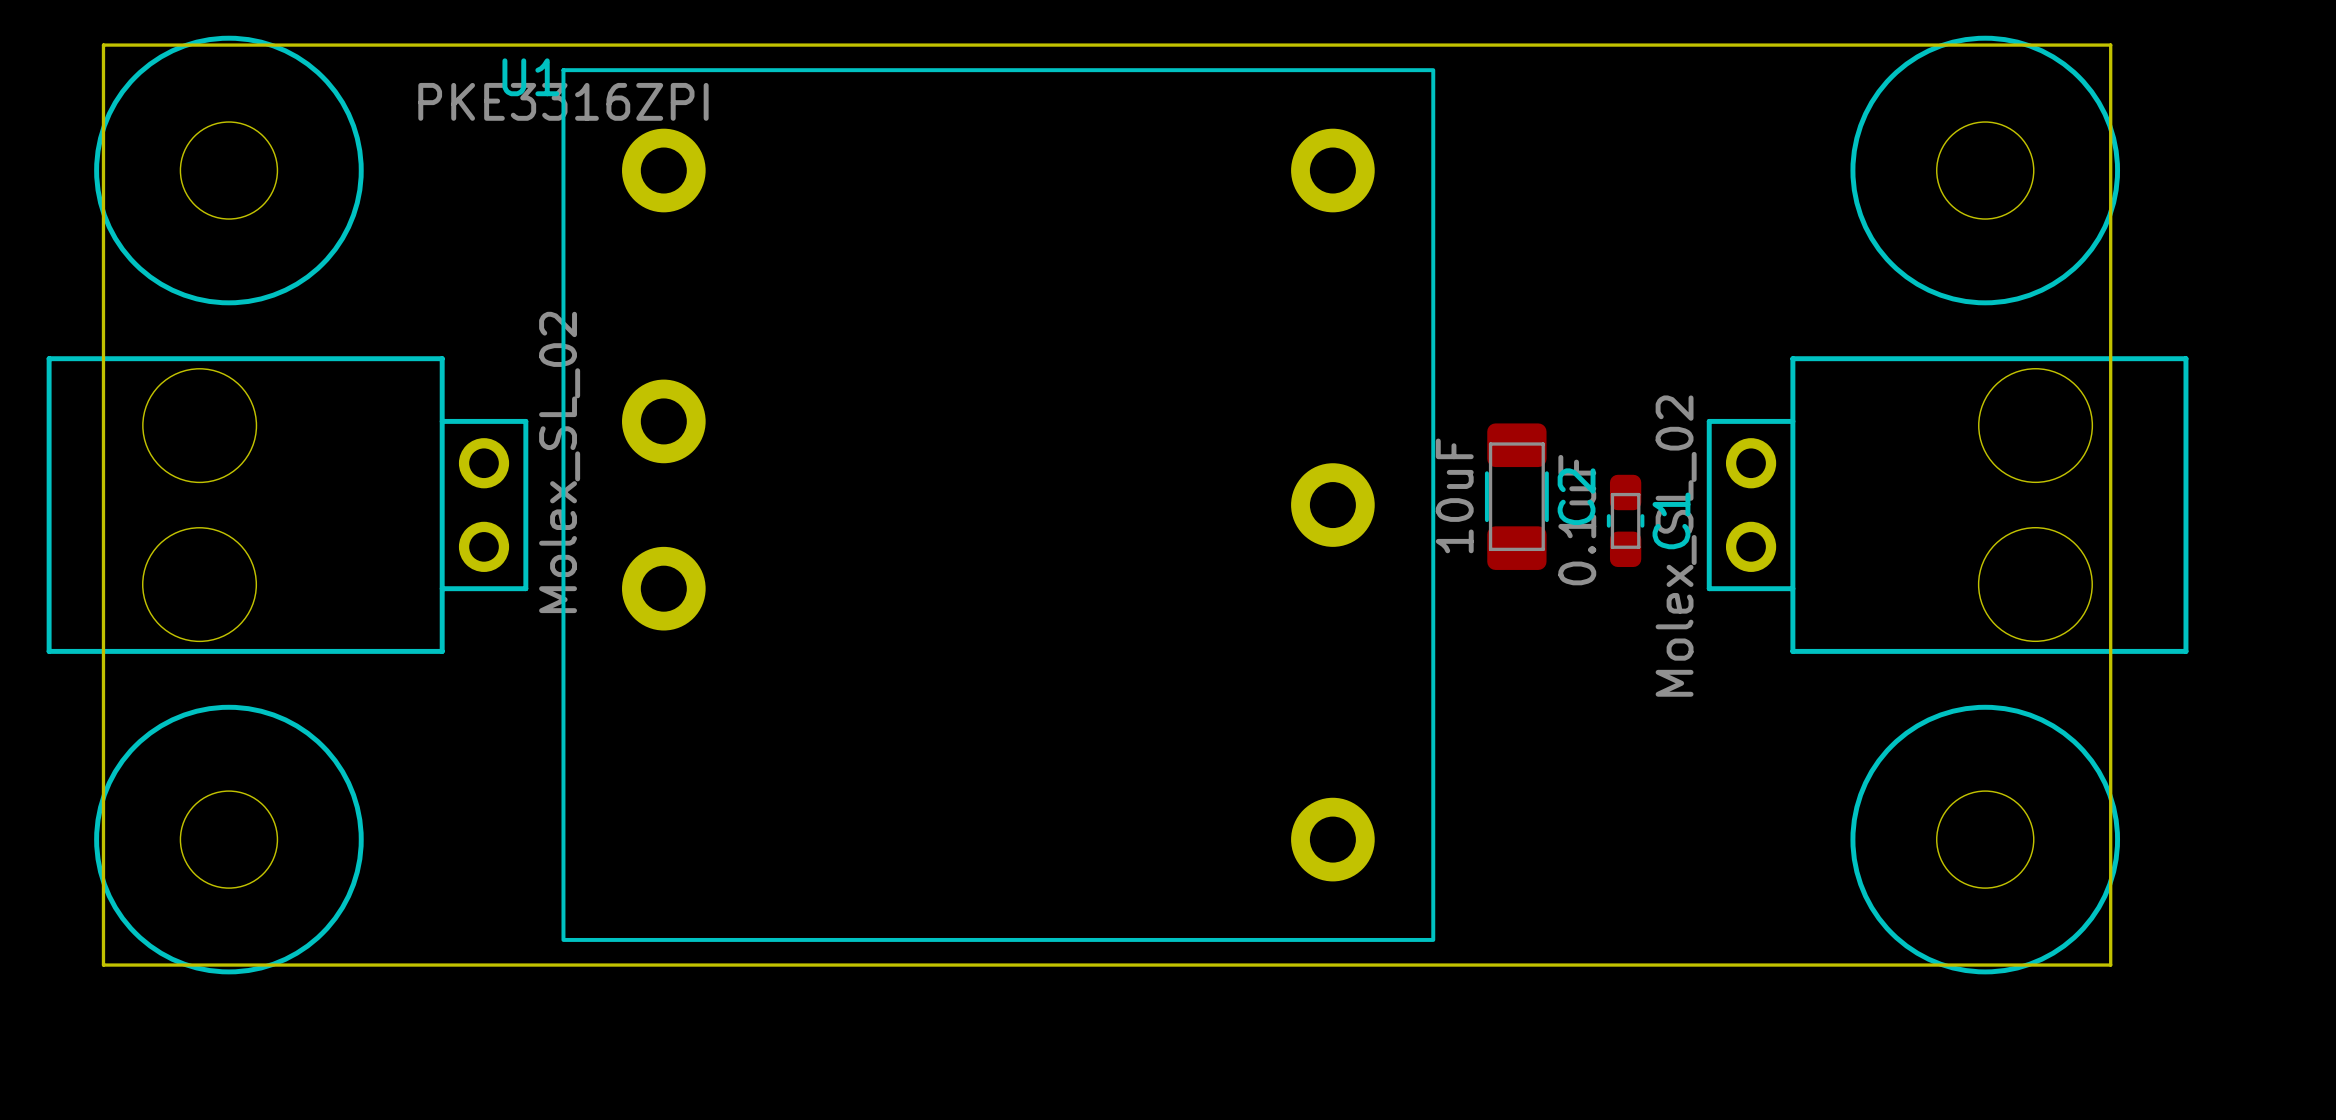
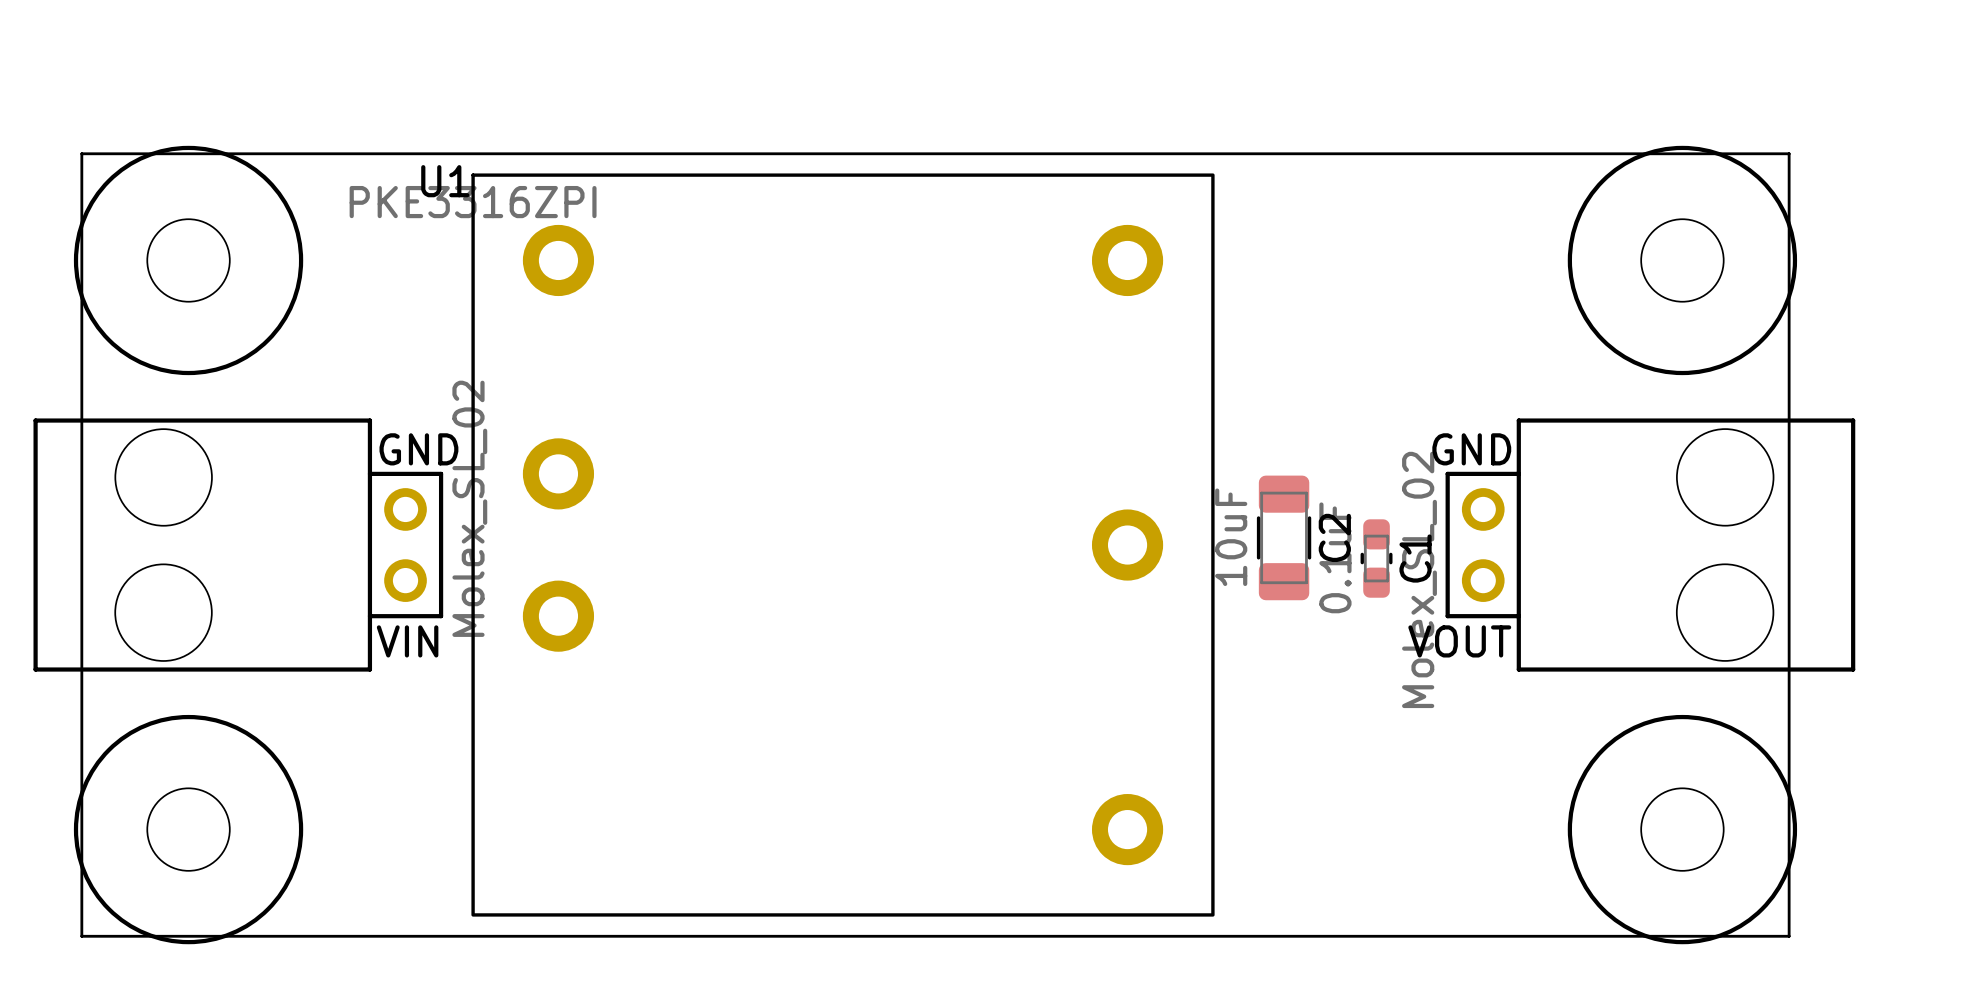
text: none -> GND (418, 449)
text: none -> GND (1471, 449)
text: none -> VIN (407, 641)
text: none -> VOUT (1459, 641)

